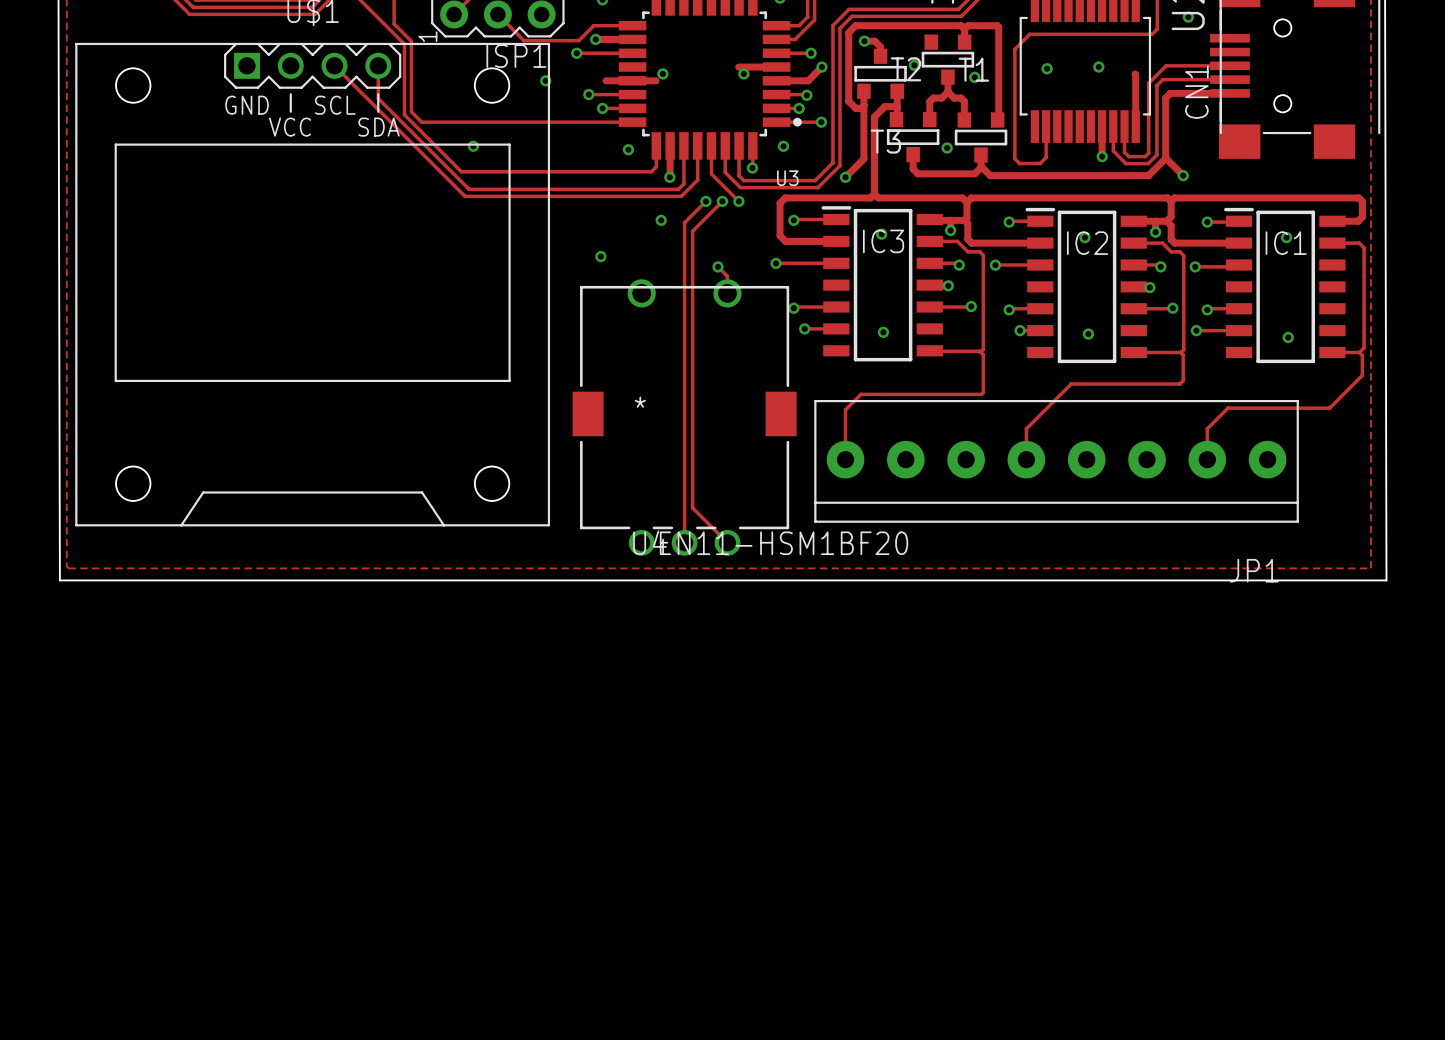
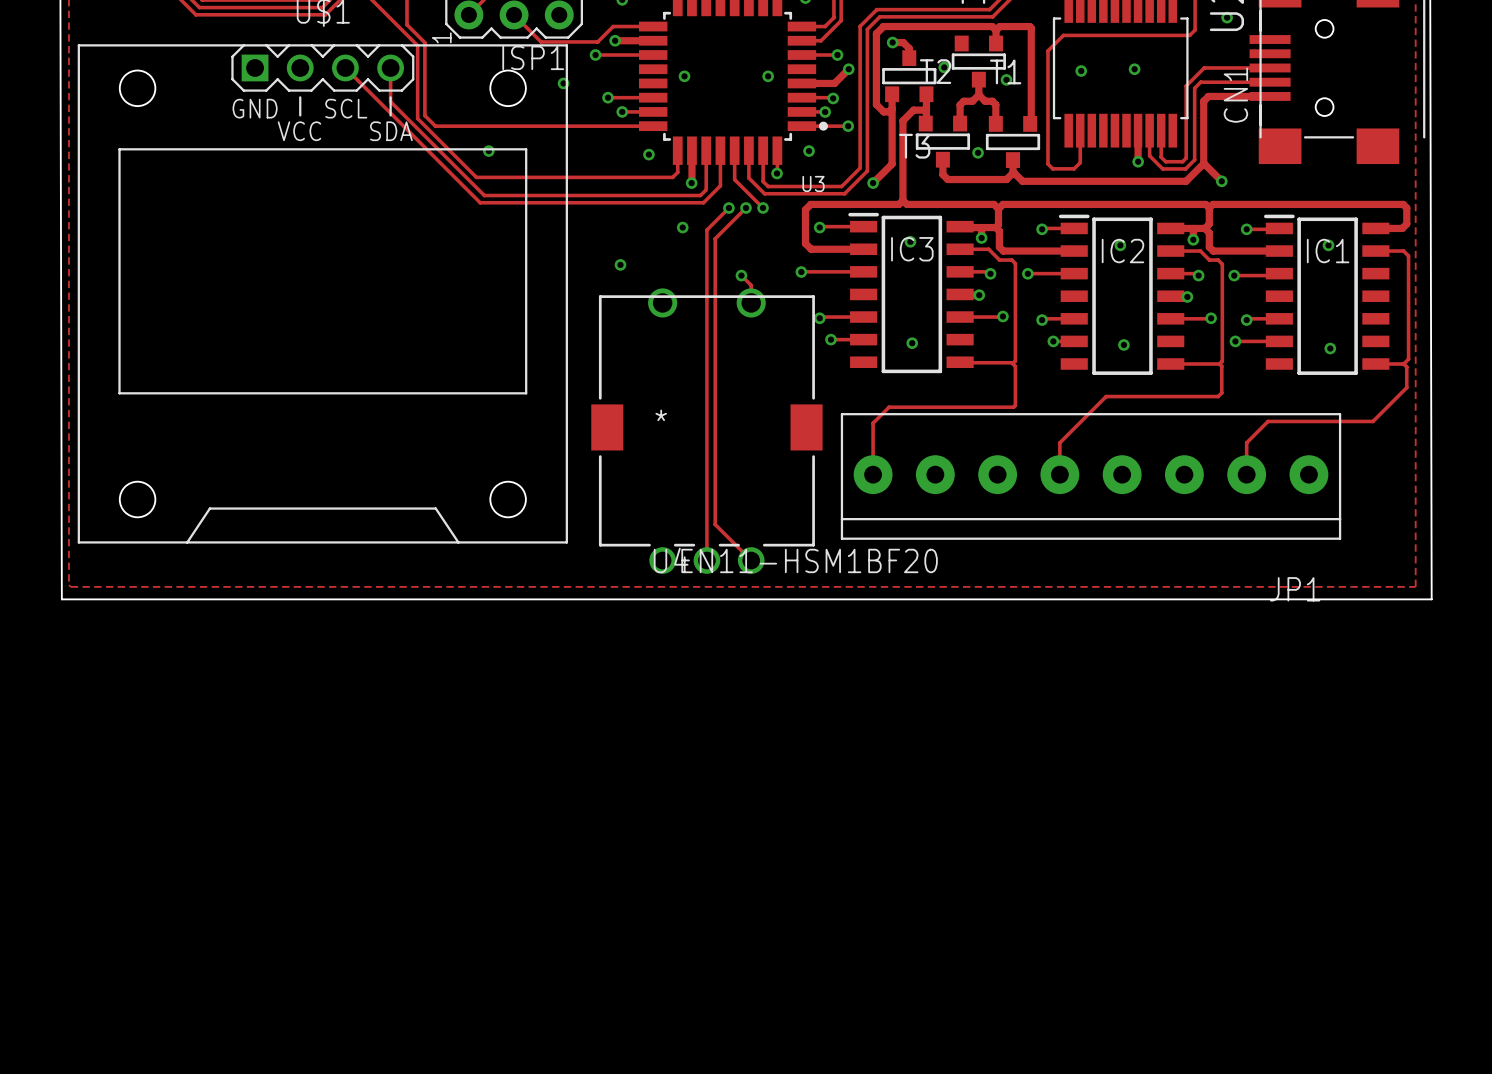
track: (738, 67) (776, 67) -> none
track: (1134, 73) (1135, 126) -> none
track: (606, 80) (656, 80) -> none

